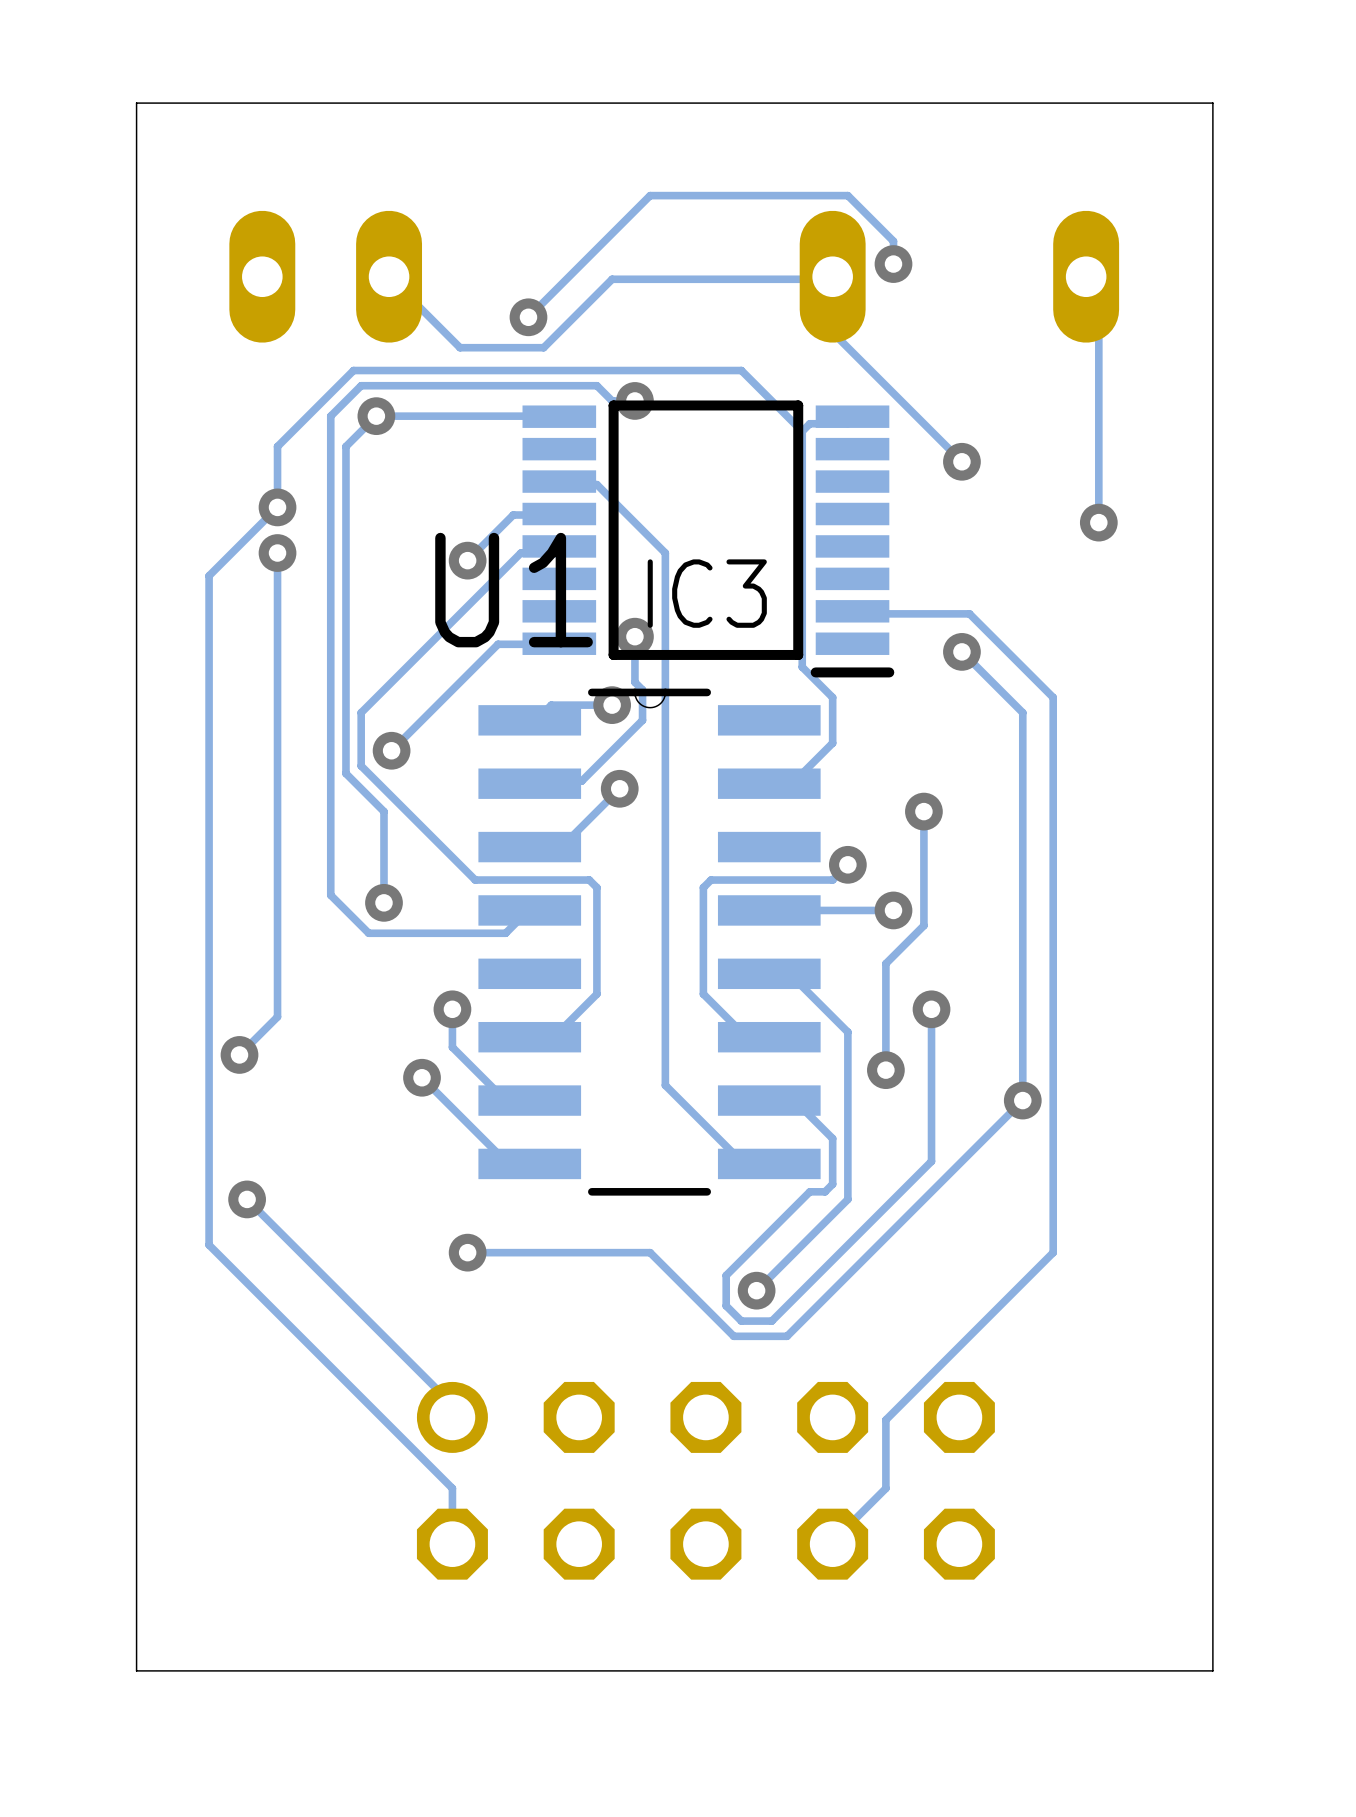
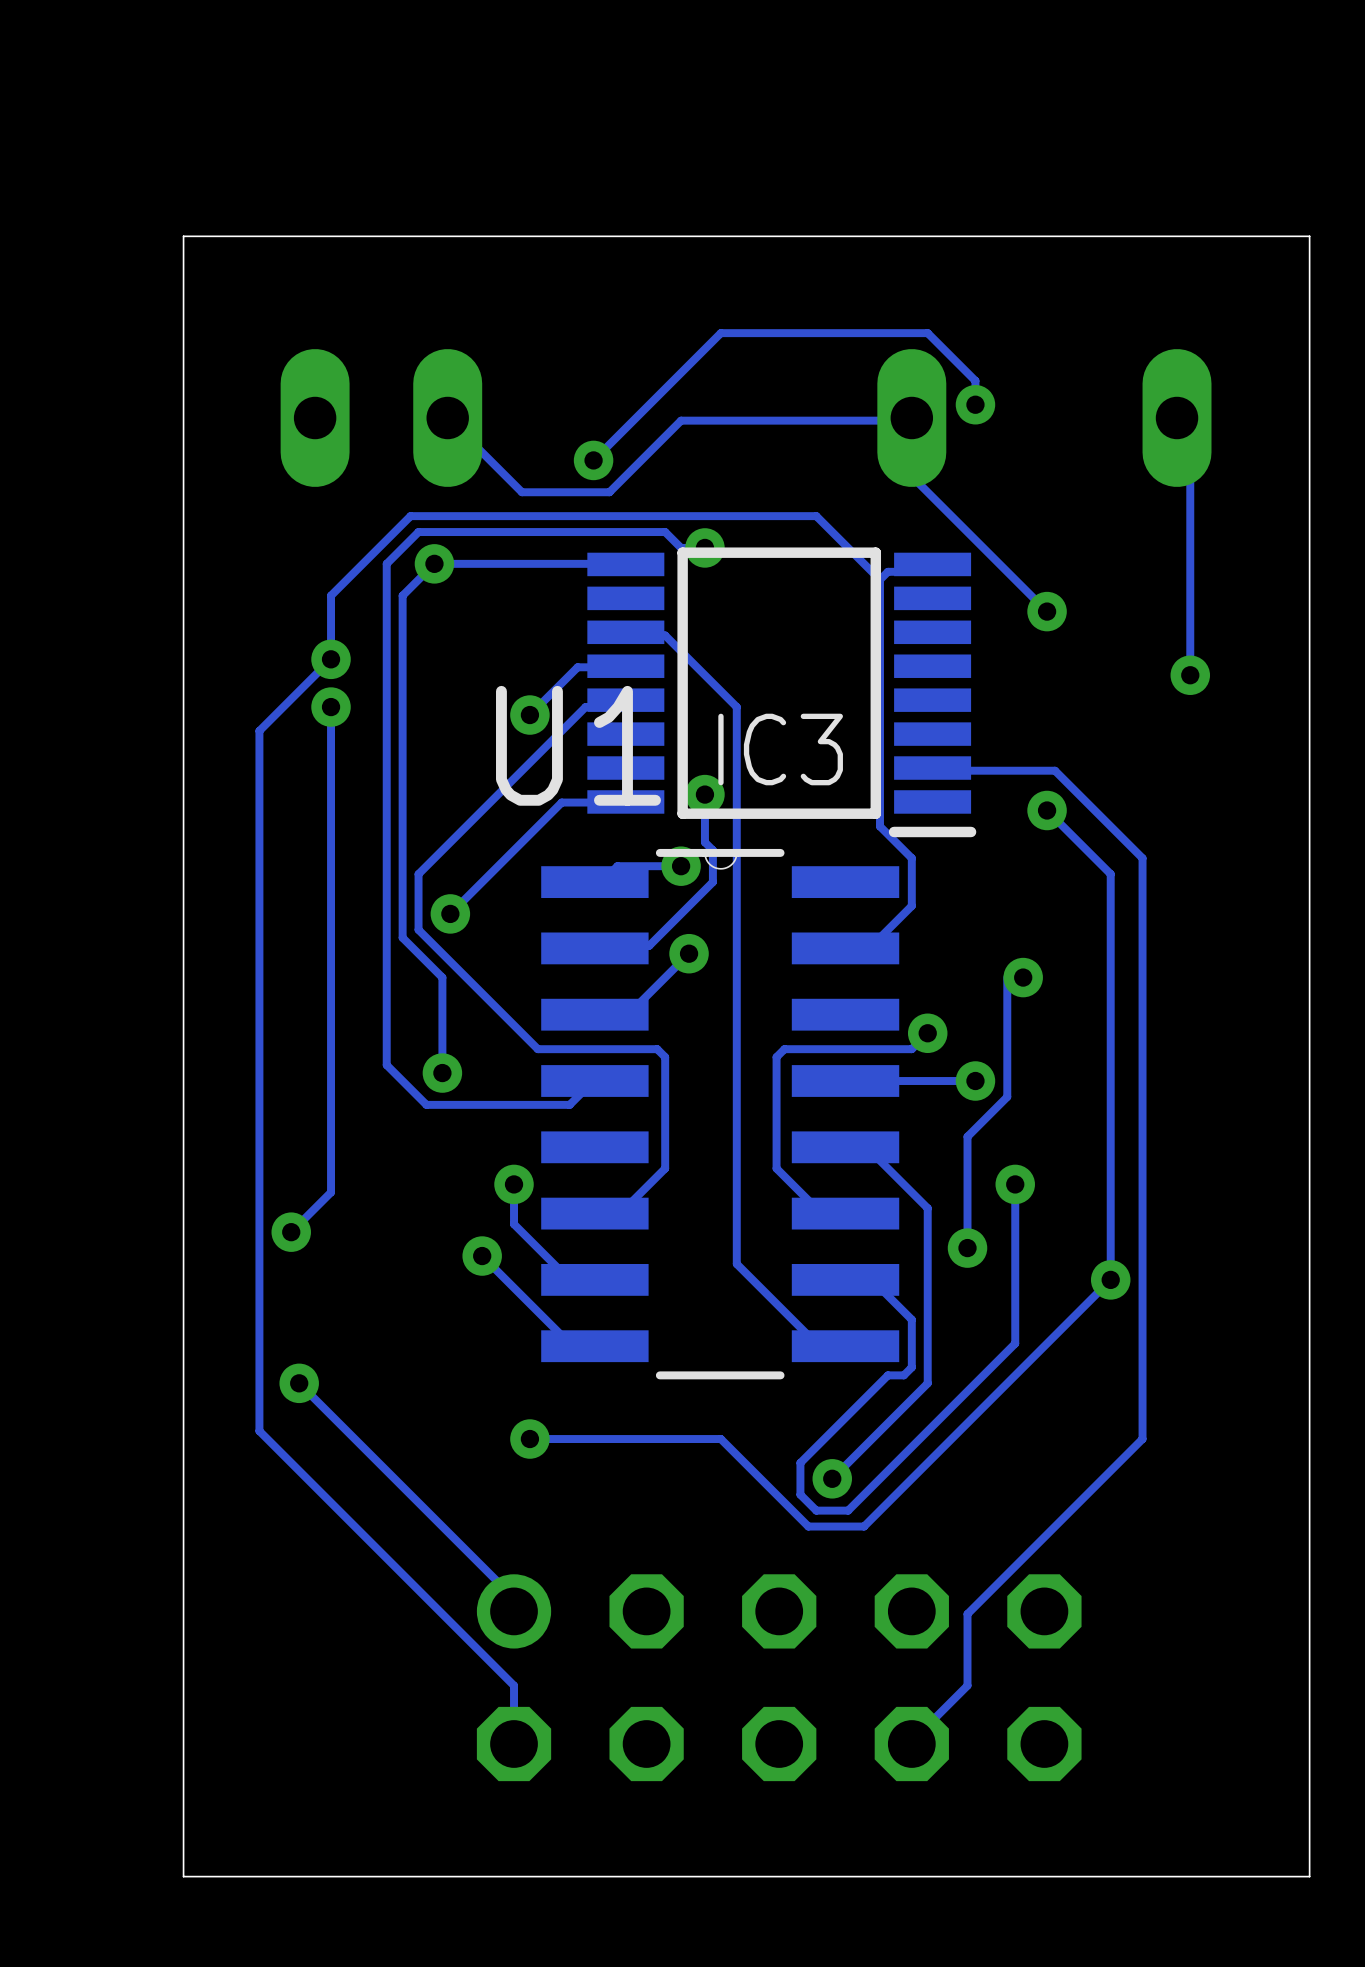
via position: (923, 811) -> (1023, 977)

